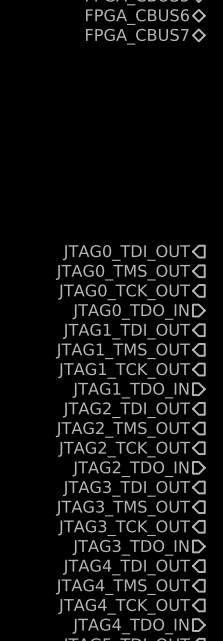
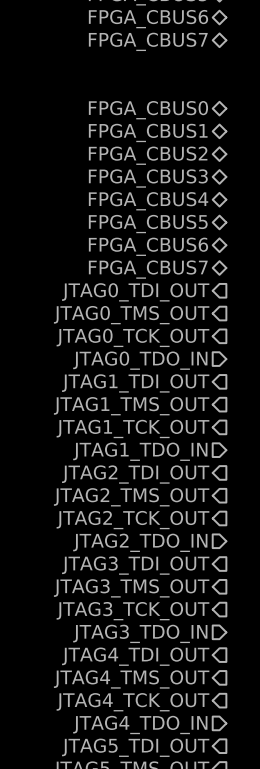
hierarchical label: none -> FPGA_CBUS0 (148, 110)
hierarchical label: none -> FPGA_CBUS1 (148, 132)
hierarchical label: none -> FPGA_CBUS2 (148, 155)
hierarchical label: none -> FPGA_CBUS3 (148, 178)
hierarchical label: none -> FPGA_CBUS4 (148, 201)
hierarchical label: none -> FPGA_CBUS5 (148, 224)
hierarchical label: none -> FPGA_CBUS6 (148, 246)
hierarchical label: none -> FPGA_CBUS7 (148, 269)

